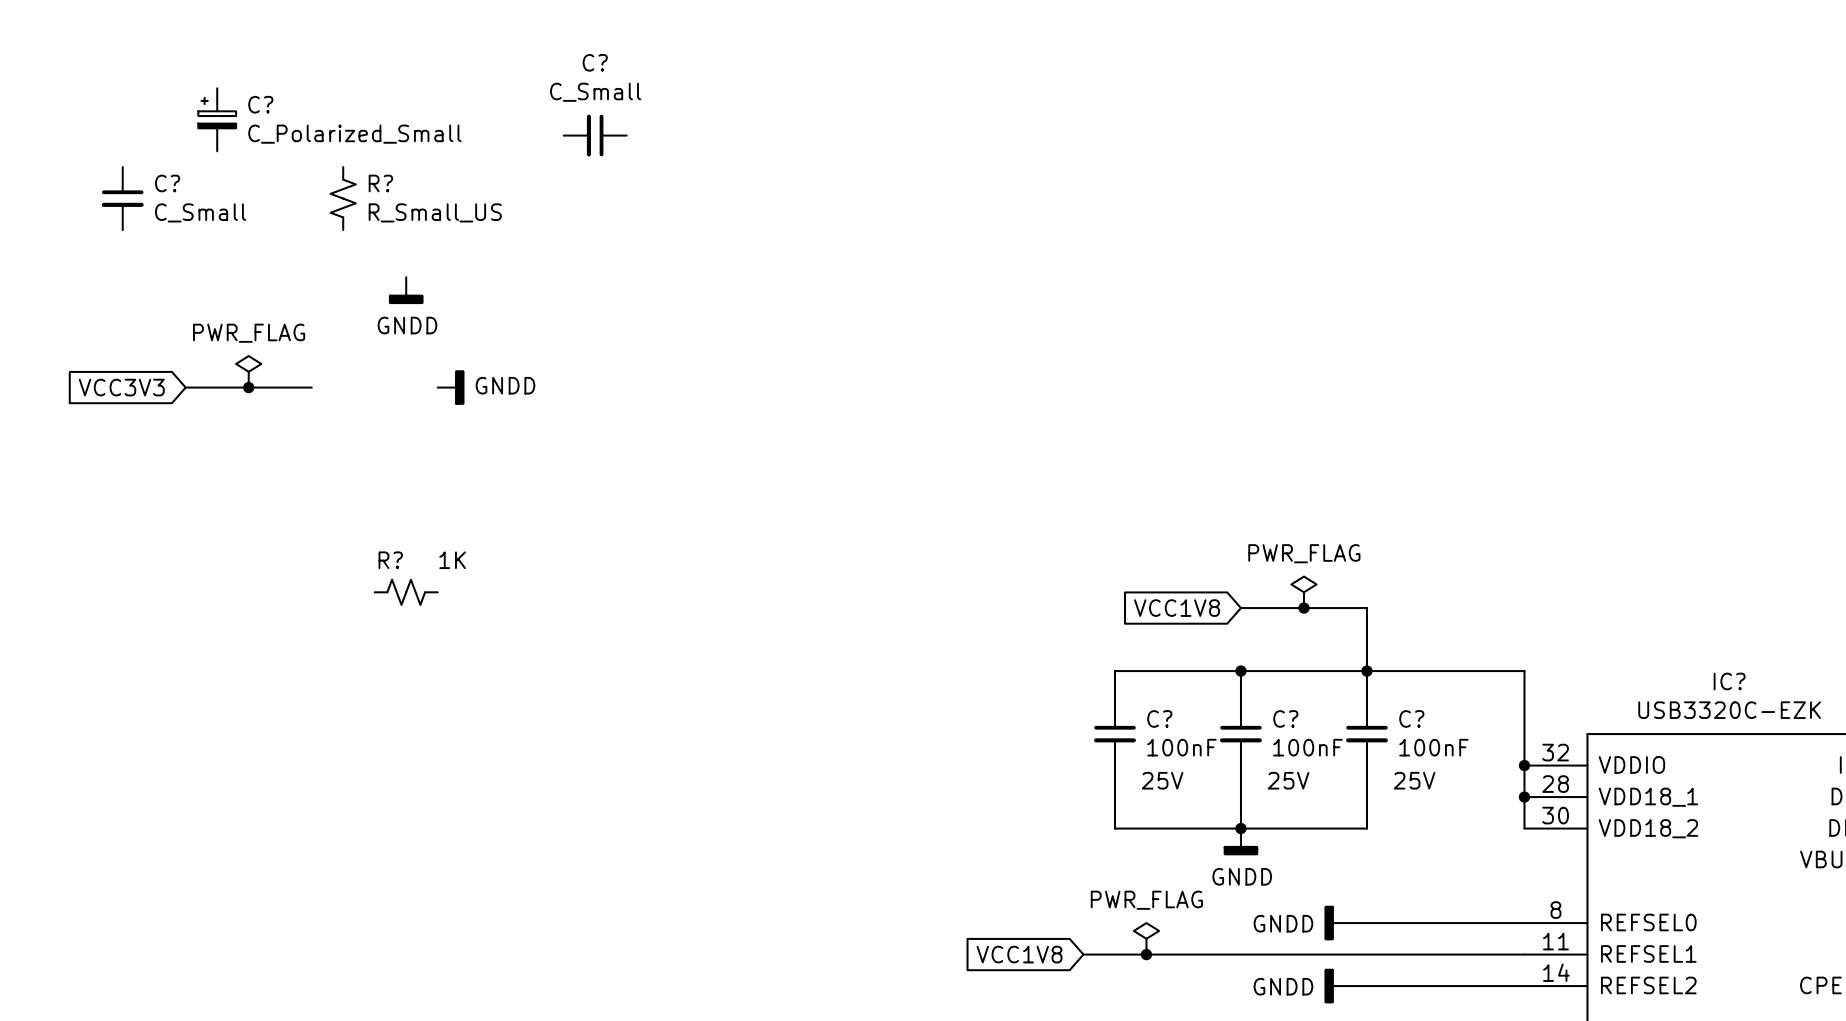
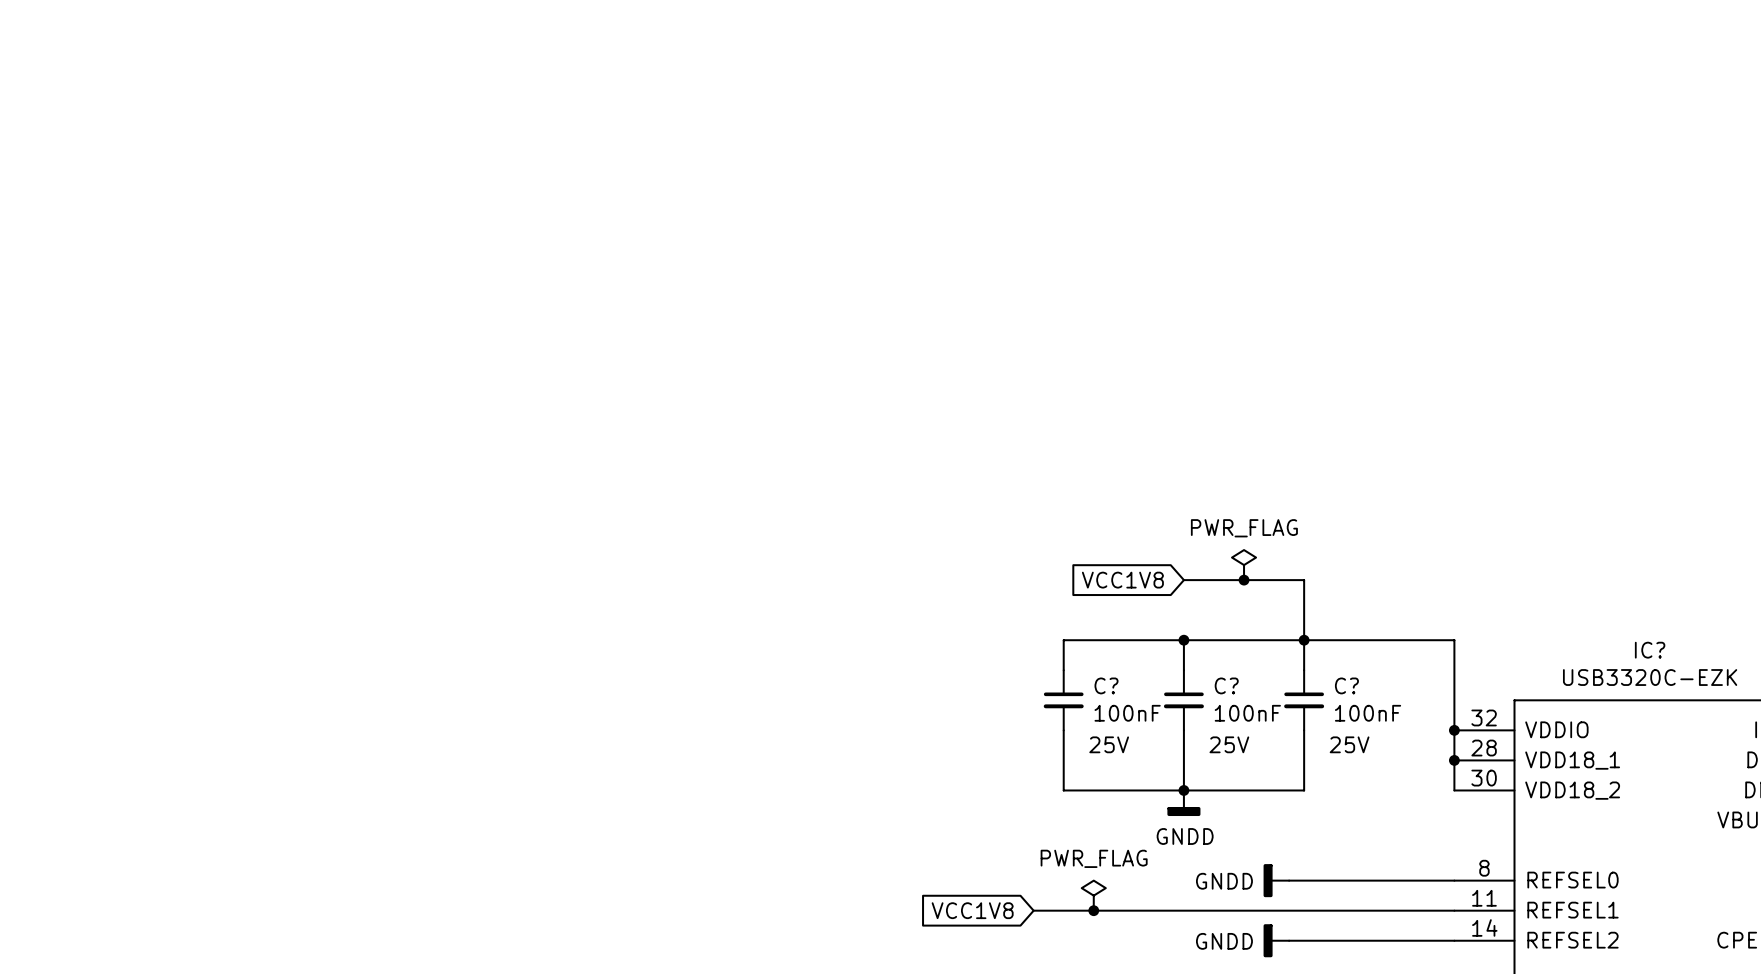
C?: C_Polarized_Small (217, 119) -> none
C?: C_Small (595, 135) -> none
C?: C_Small (122, 198) -> none
R?: R_Small_US (343, 198) -> none
power symbol: GNDD (406, 290) -> none
power symbol: PWR_FLAG (248, 371) -> none
global label: VCC3V3 (121, 387) -> none
wire: (185, 387) (311, 387) -> none
junction: (248, 387) -> none
power symbol: GNDD (451, 387) -> none
R?: 1K (406, 592) -> none

